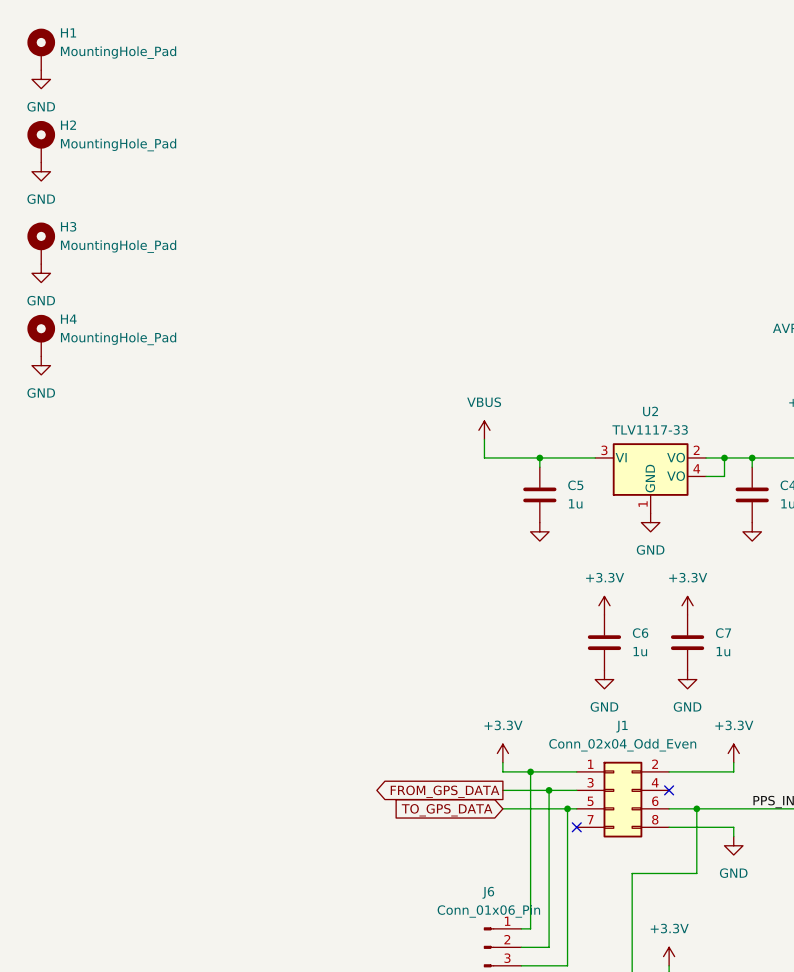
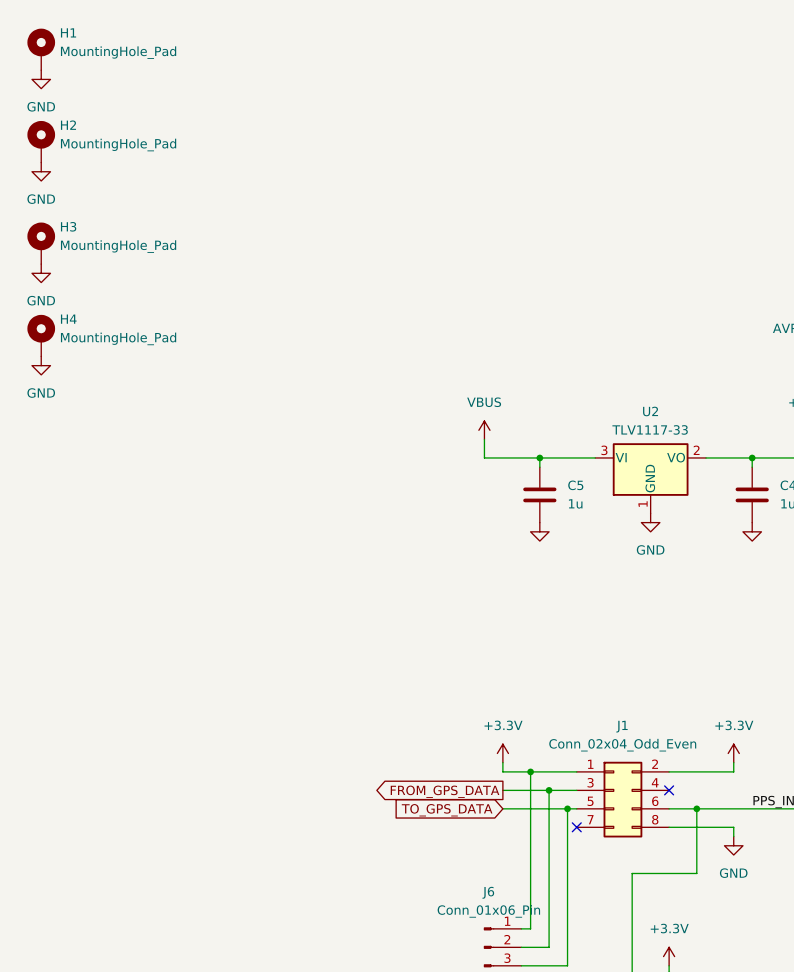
U2 symbol: [595, 443, 707, 514] -> [595, 443, 707, 514]
wire: (724, 457) (724, 476) (706, 476) -> none
junction: (724, 457) -> none
power symbol: +3.3V (604, 605) -> none
power symbol: +3.3V (687, 605) -> none
C6: 1u (604, 642) -> none
C7: 1u (687, 642) -> none
power symbol: GND (604, 679) -> none
power symbol: GND (687, 679) -> none

